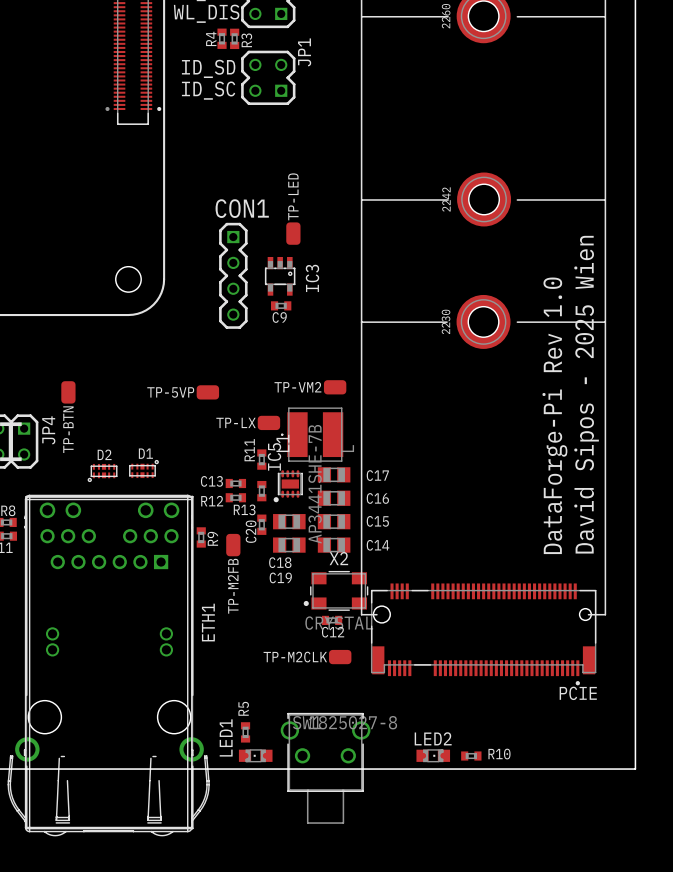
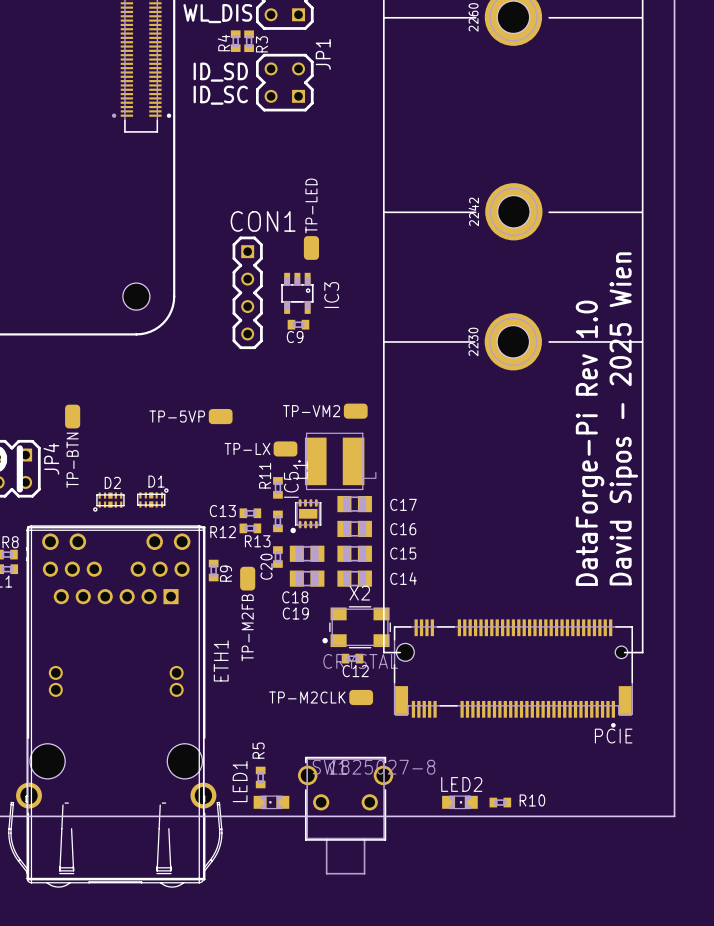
IC5 value: AP3441SHE-7B (315, 484) -> none

